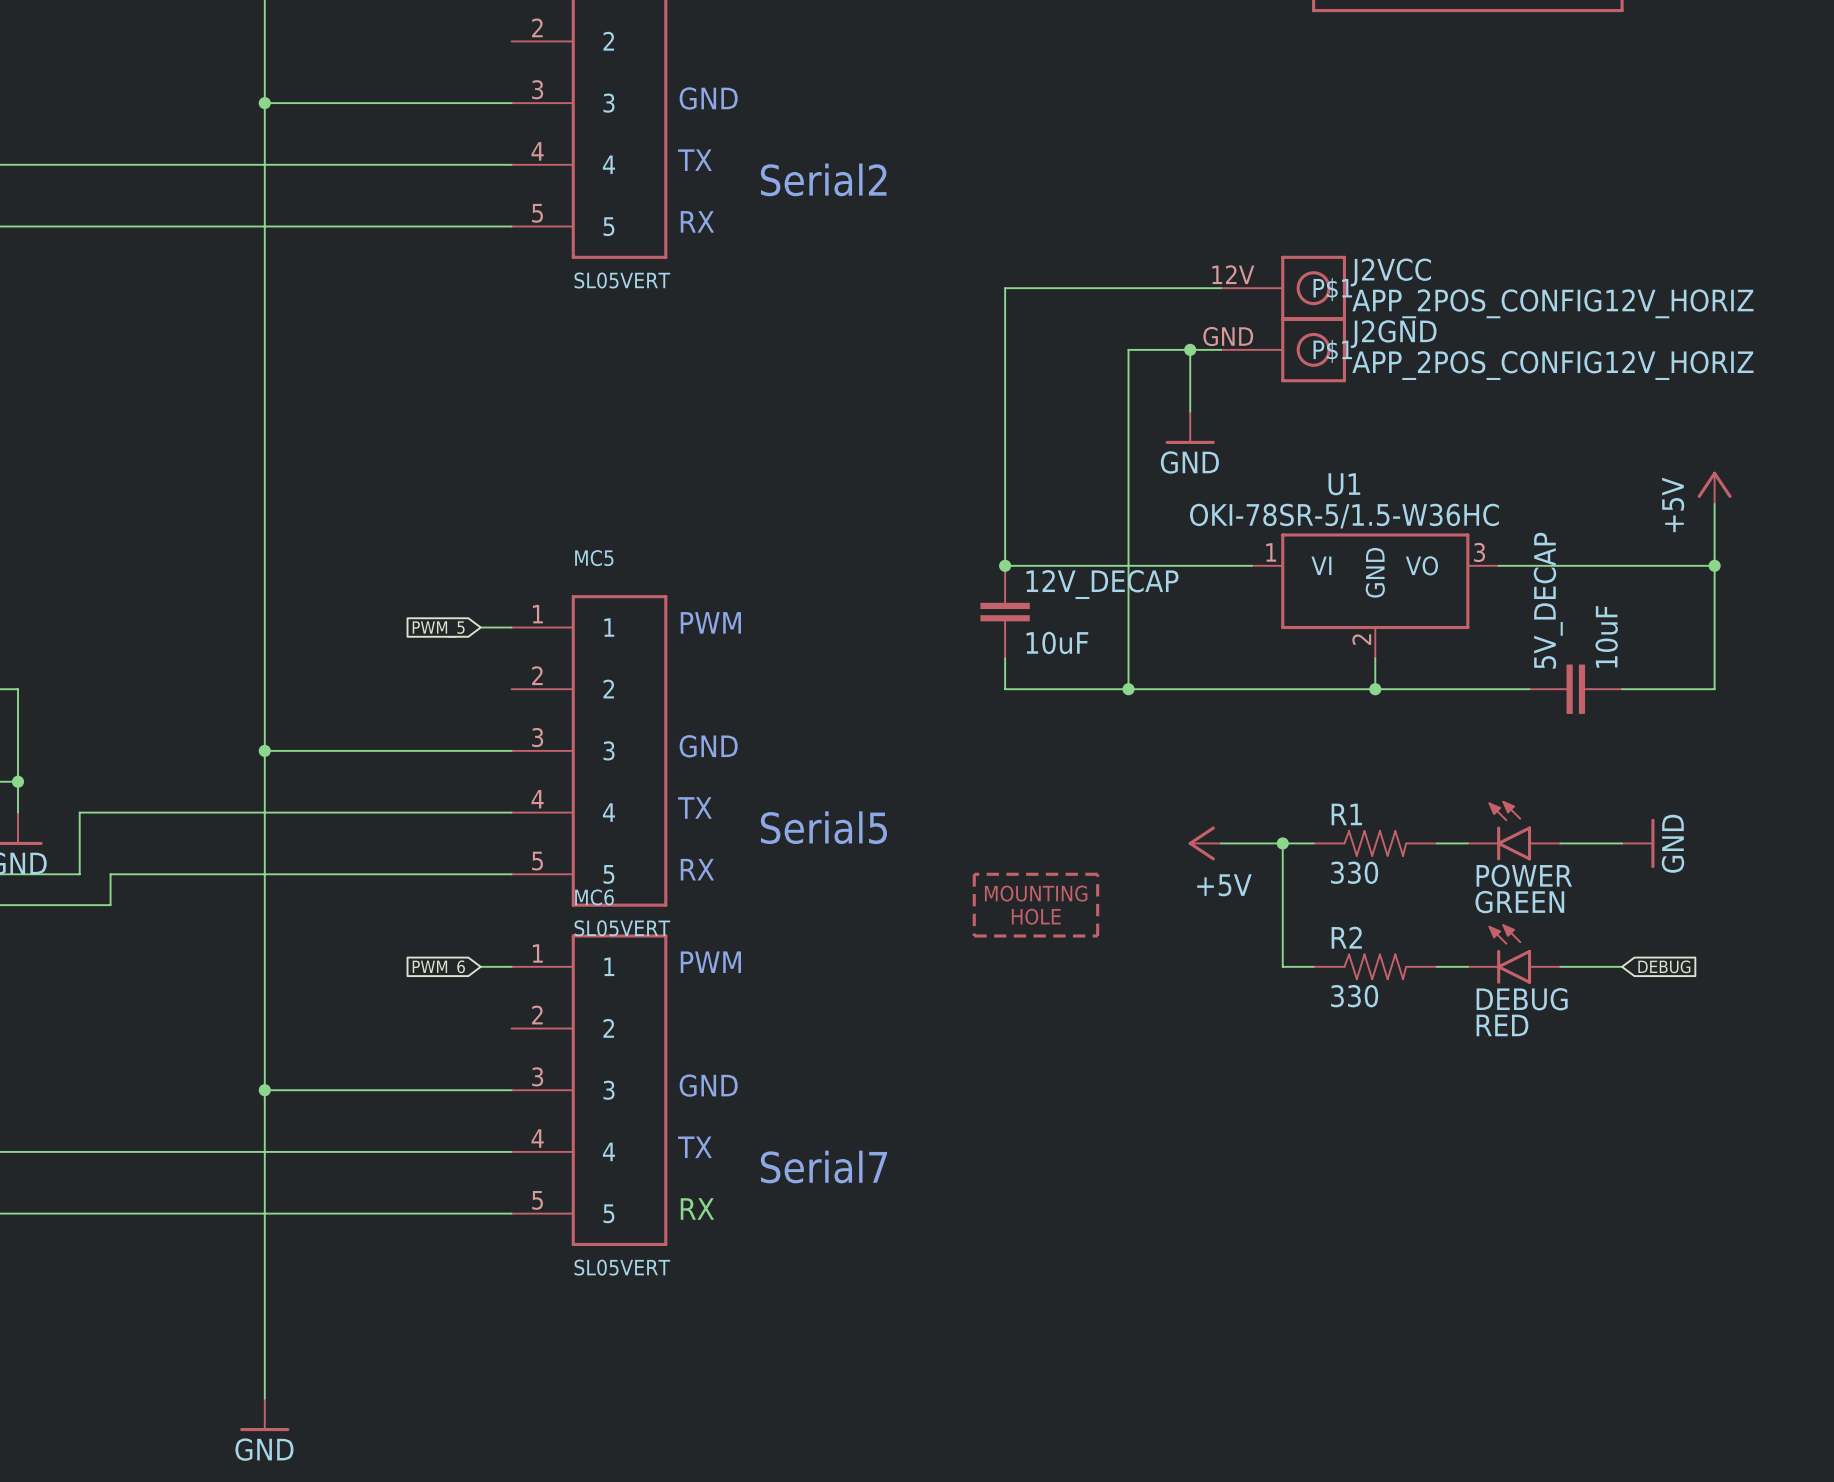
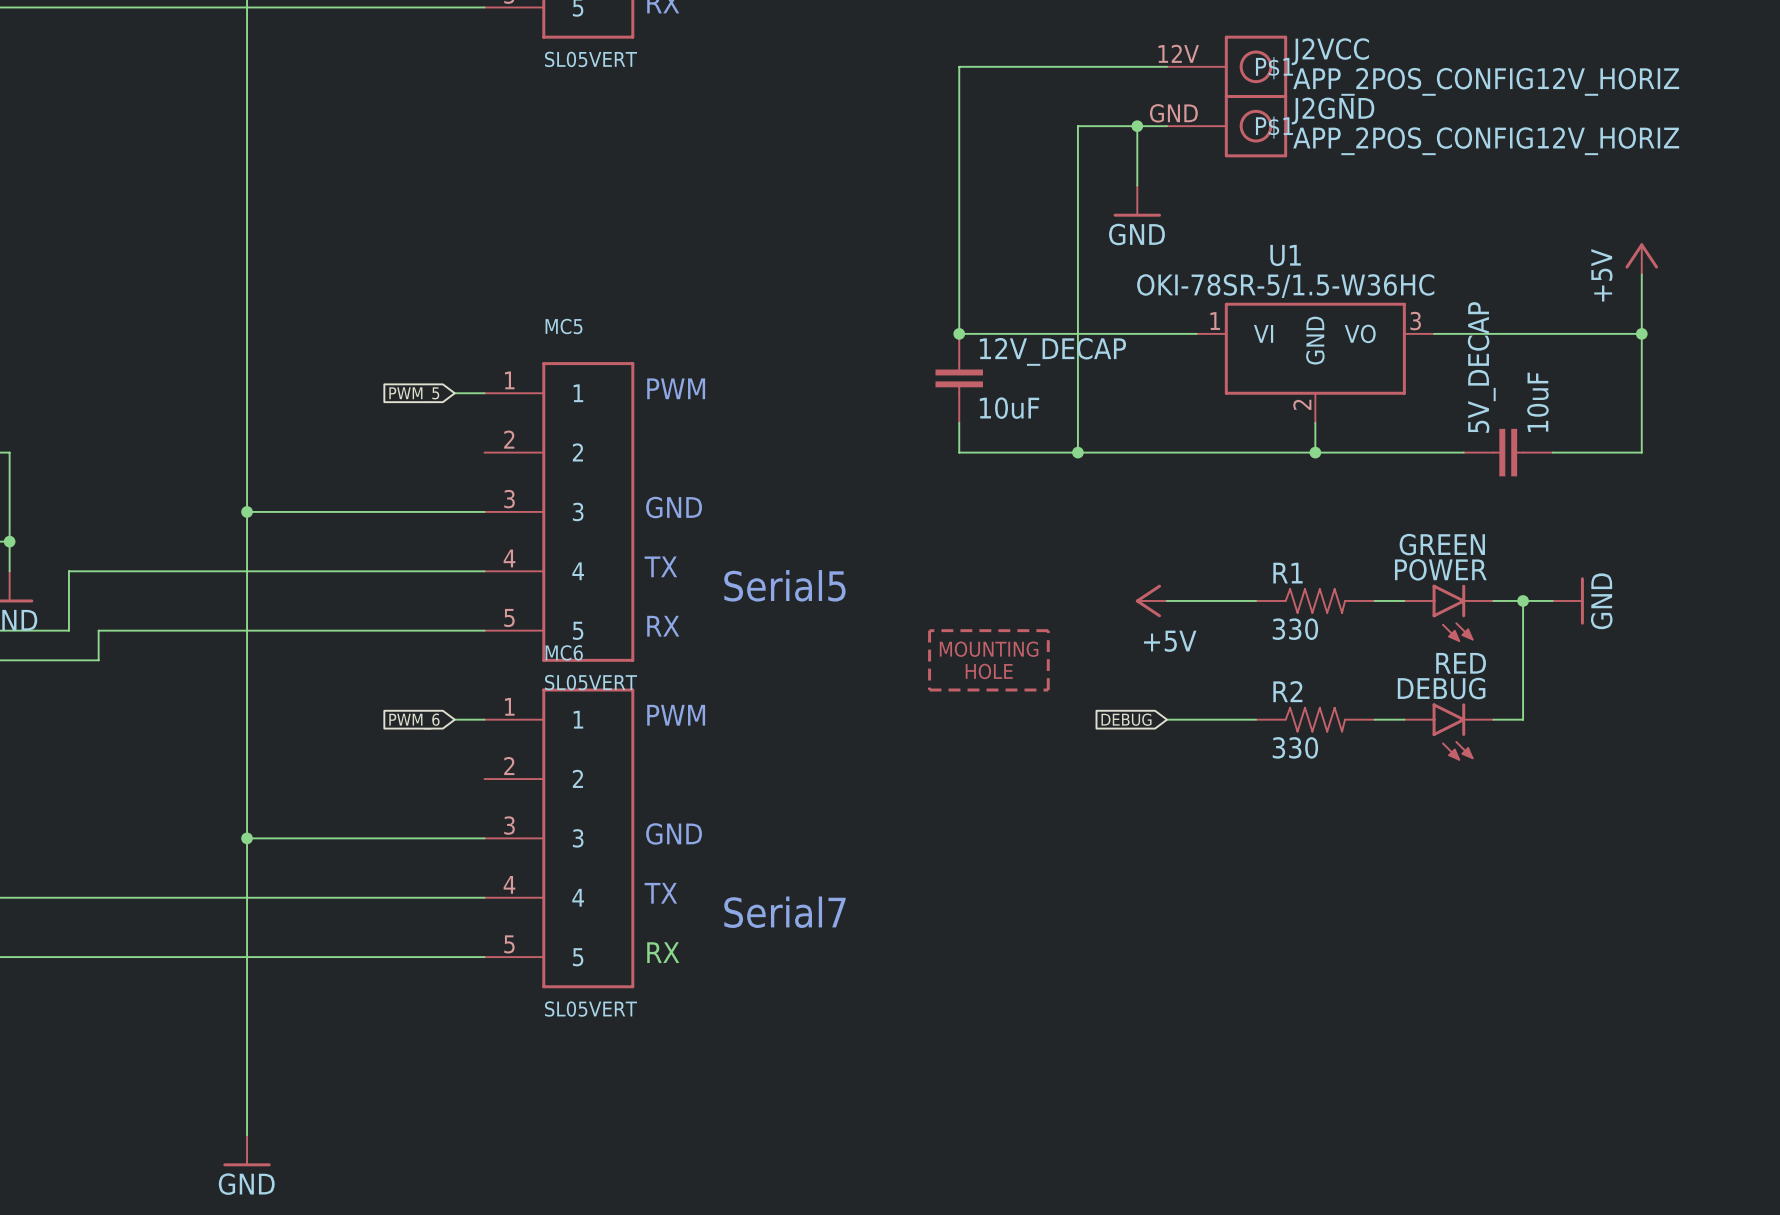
POWER rotation: 0° (1509, 830) -> 180° (1453, 613)
wire: (1282, 843) (1282, 966) -> (1166, 719) (1226, 719)
junction: (1282, 843) -> none
junction: none -> (1523, 600)
DEBUG rotation: 0° (1509, 954) -> 180° (1453, 732)
global label: none -> DEBUG (1126, 719)
wire: (1591, 966) (1622, 966) -> (1523, 719) (1523, 600)
global label: DEBUG (1664, 966) -> none

